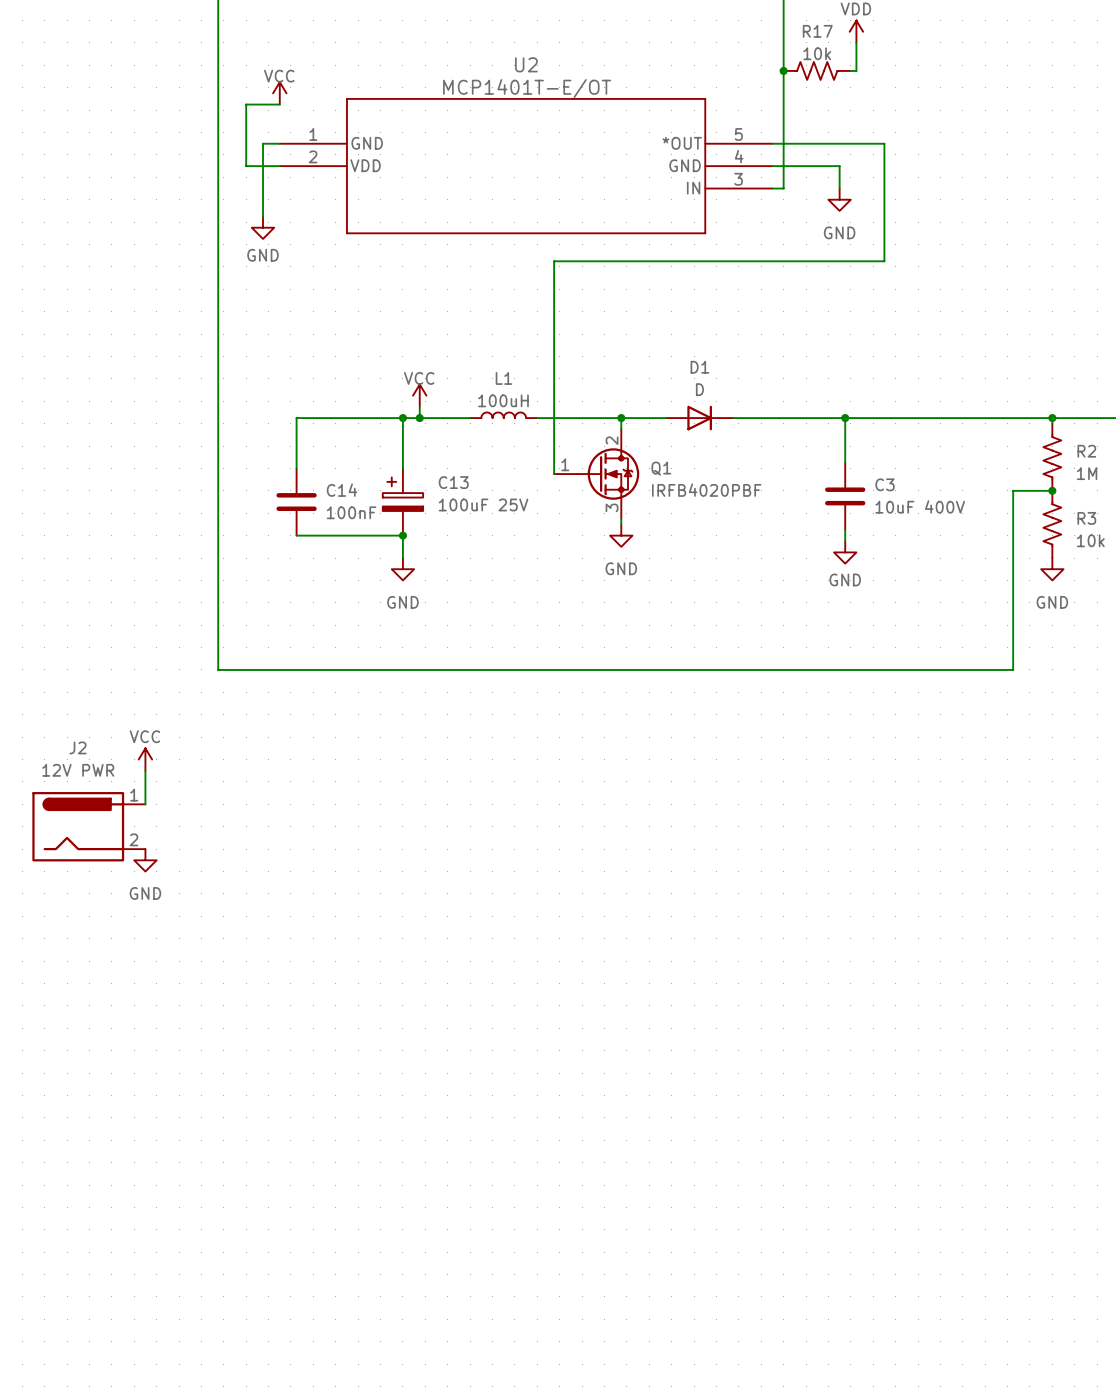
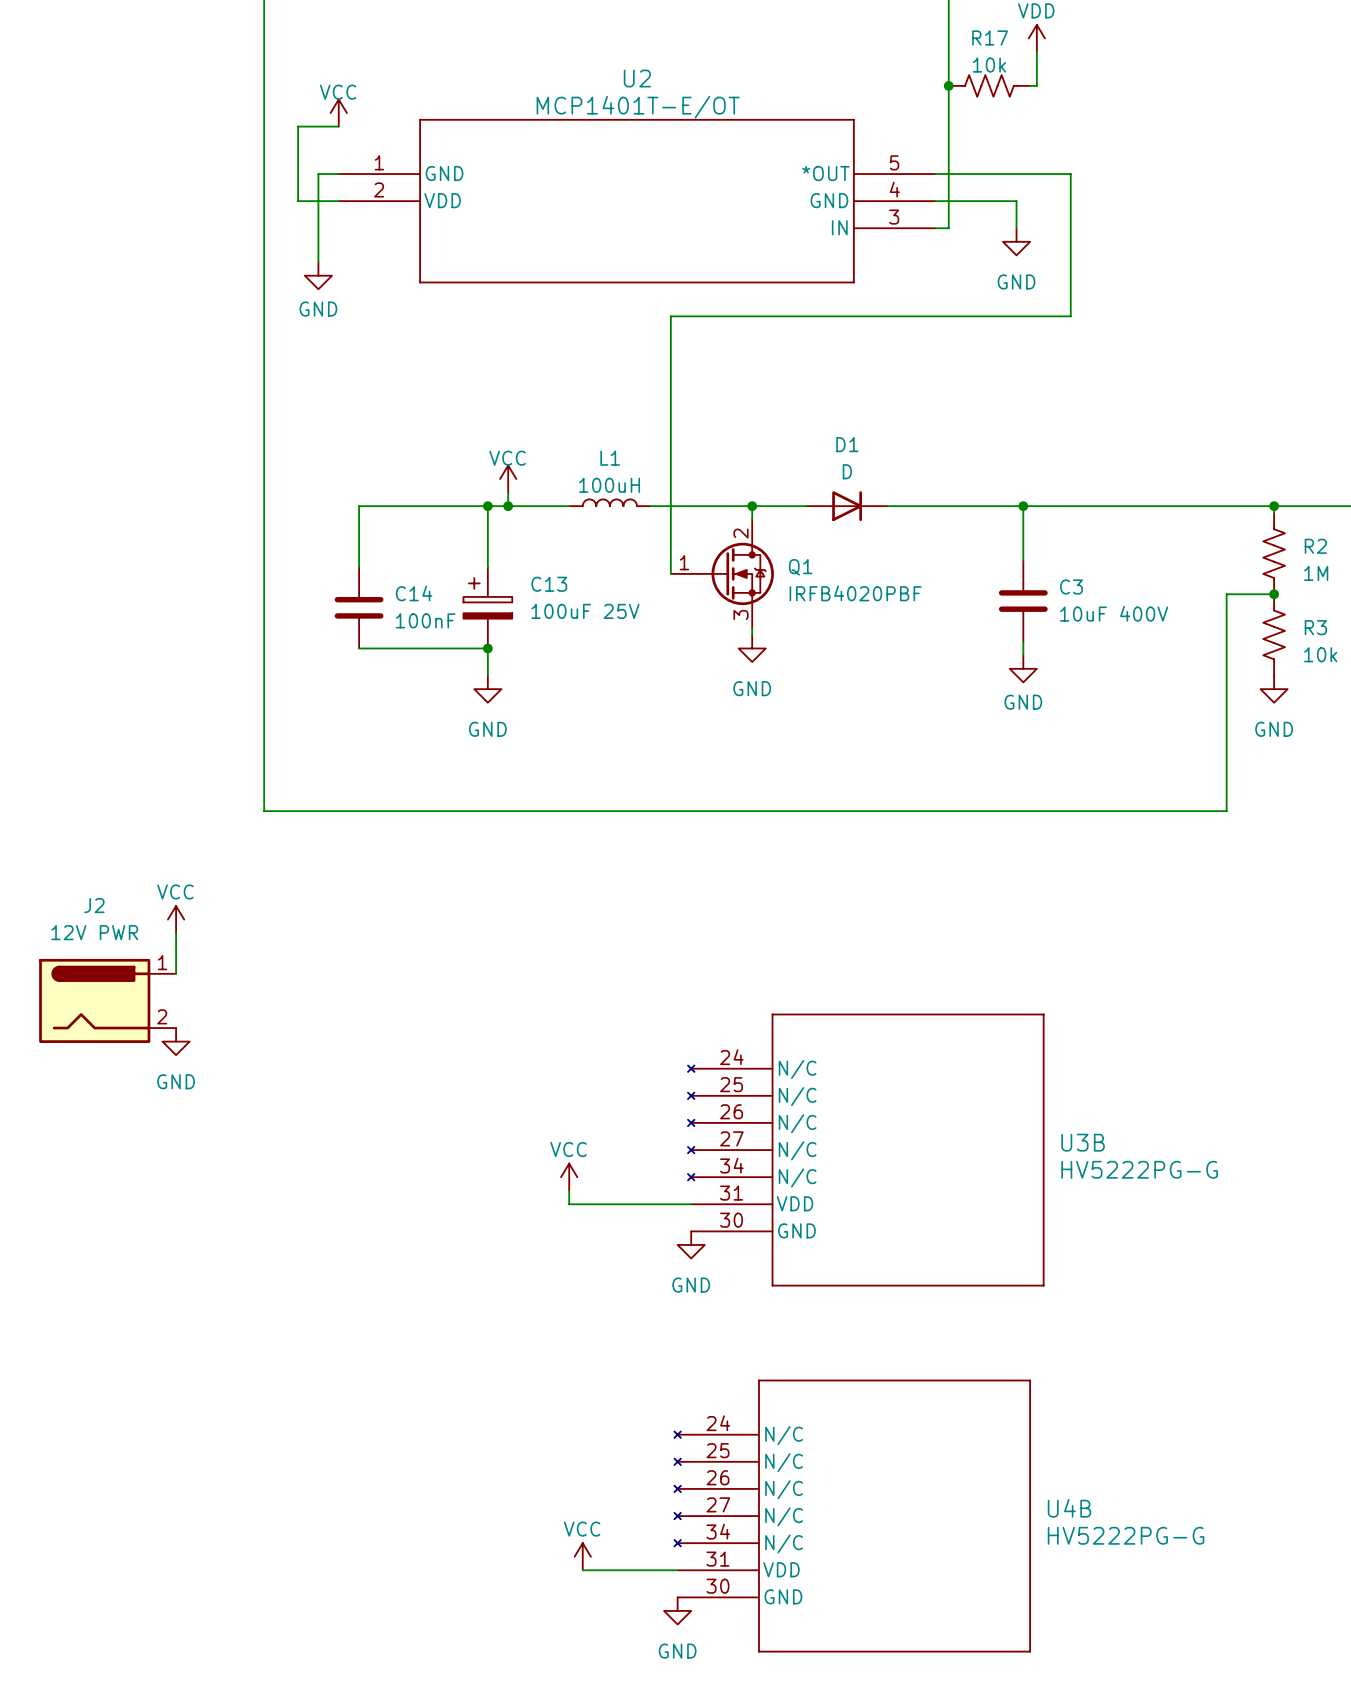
U3B: none -> HV5222PG-G (866, 1150)
power symbol: none -> VCC (569, 1177)
wire: none -> (569, 1190) (569, 1204) (691, 1204)
power symbol: none -> GND (691, 1244)
U4B: none -> HV5222PG-G (852, 1516)
power symbol: none -> VCC (582, 1556)
wire: none -> (582, 1570) (677, 1570)
power symbol: none -> GND (677, 1610)

